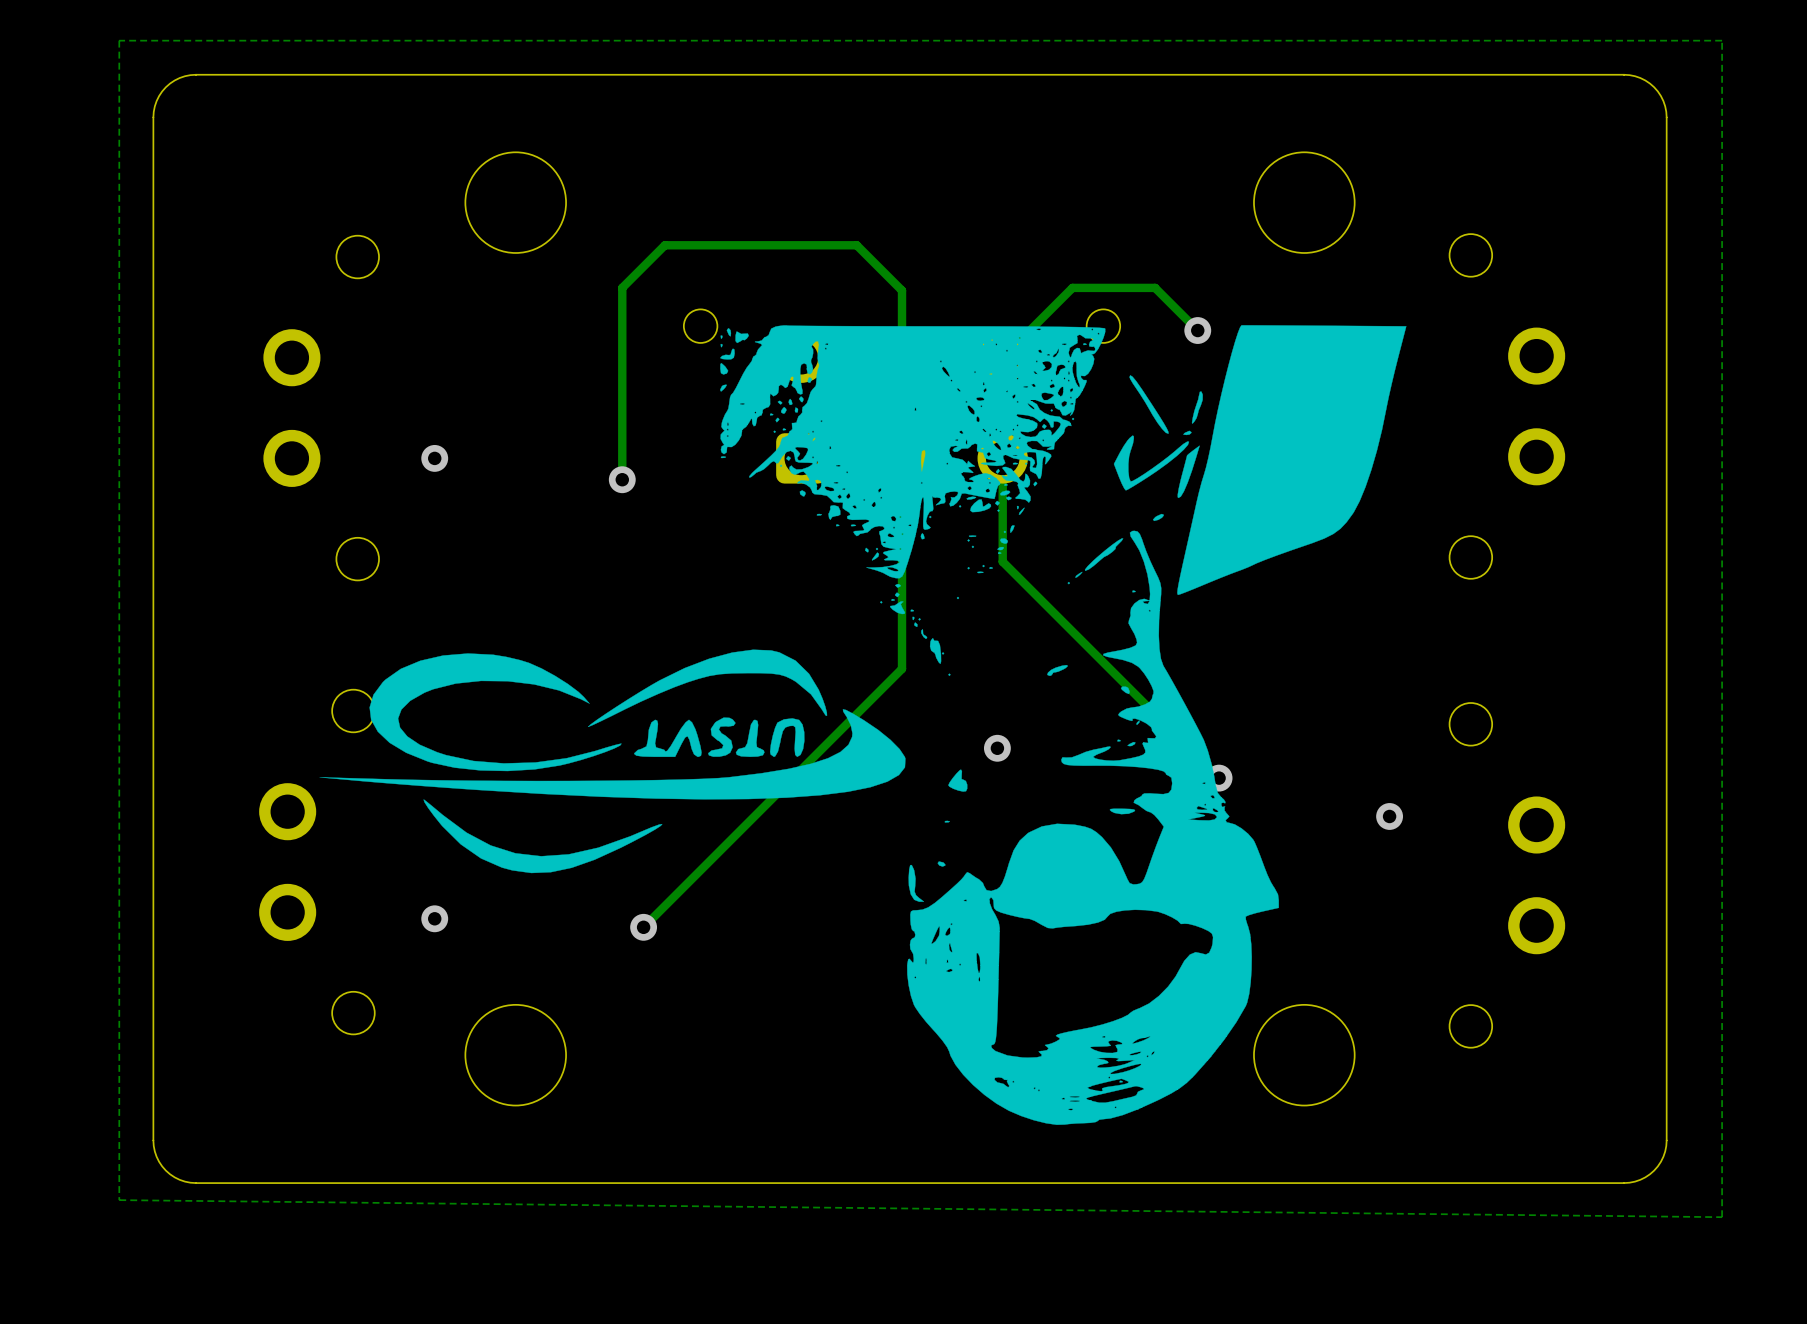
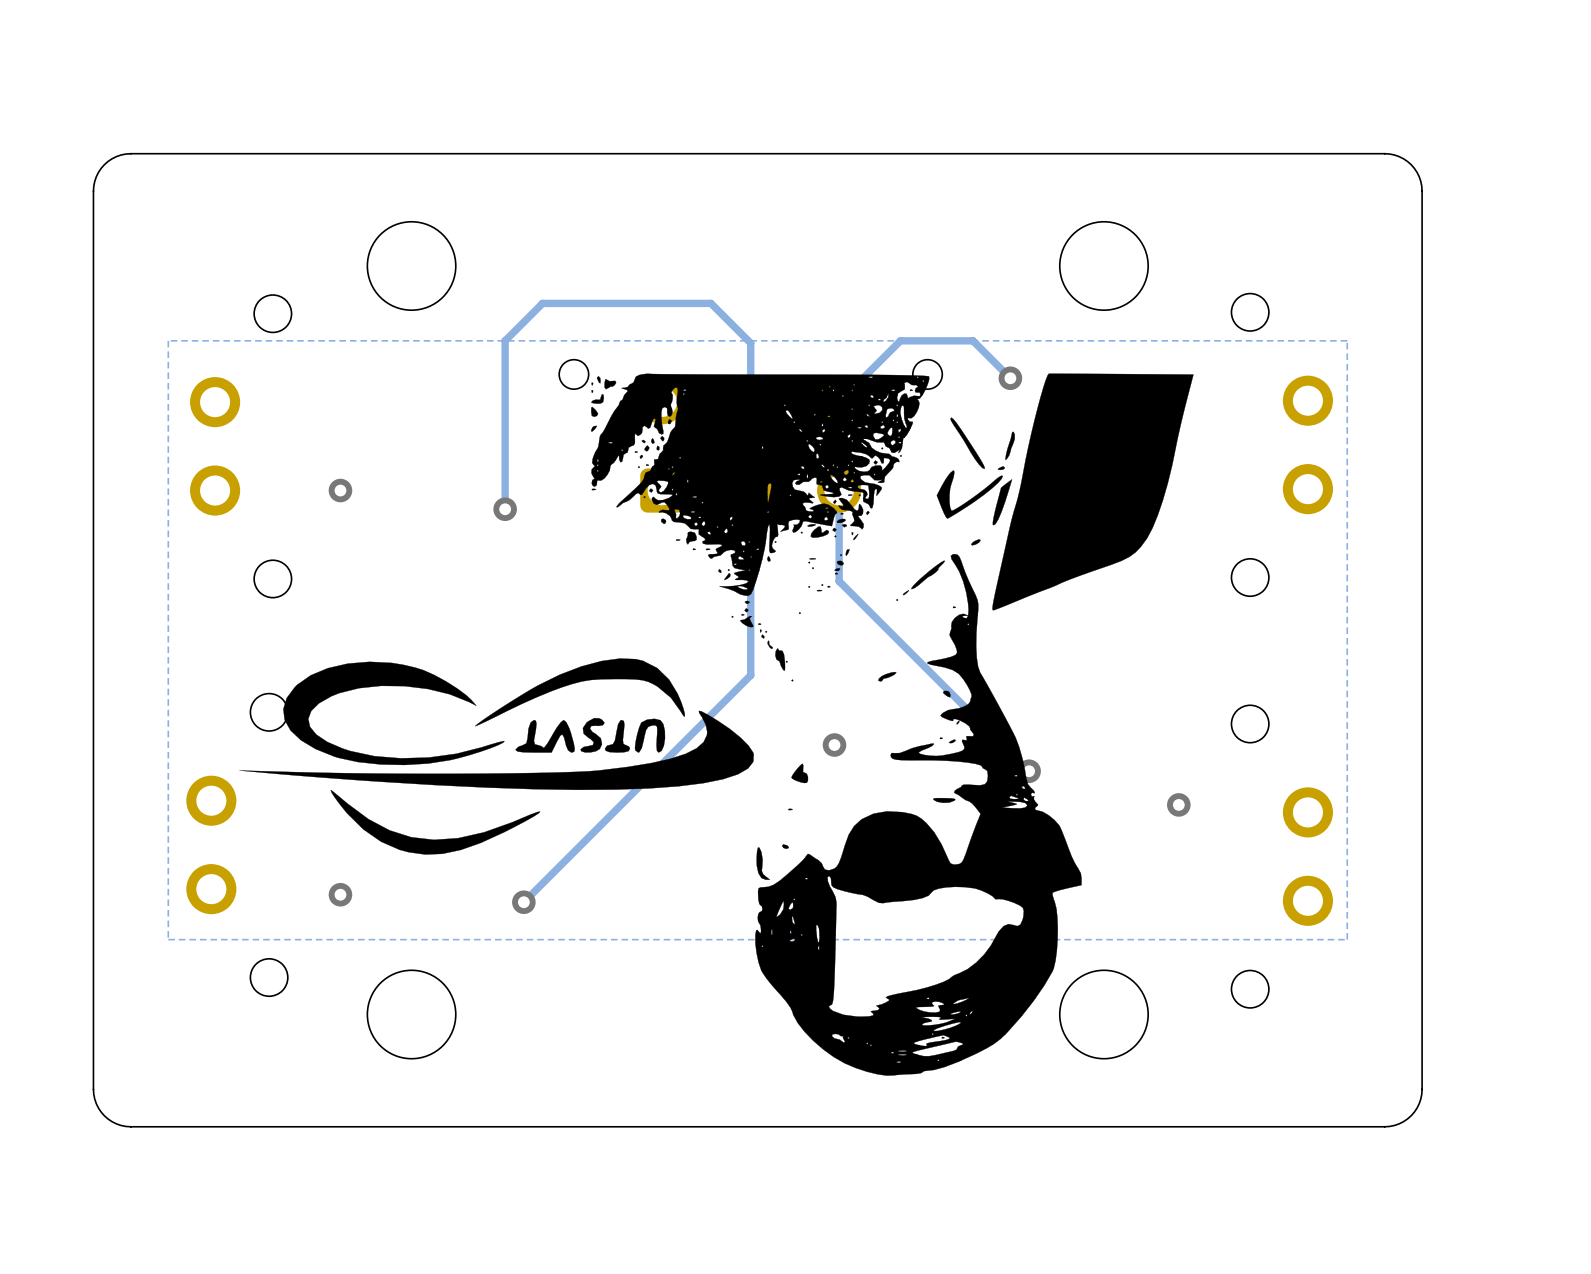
zone outline: (1722, 40) (1722, 1217) (119, 1200) (119, 40) (1722, 40) -> none
zone outline: none -> (1347, 340) (1347, 939) (168, 939) (168, 340) (1347, 340)

